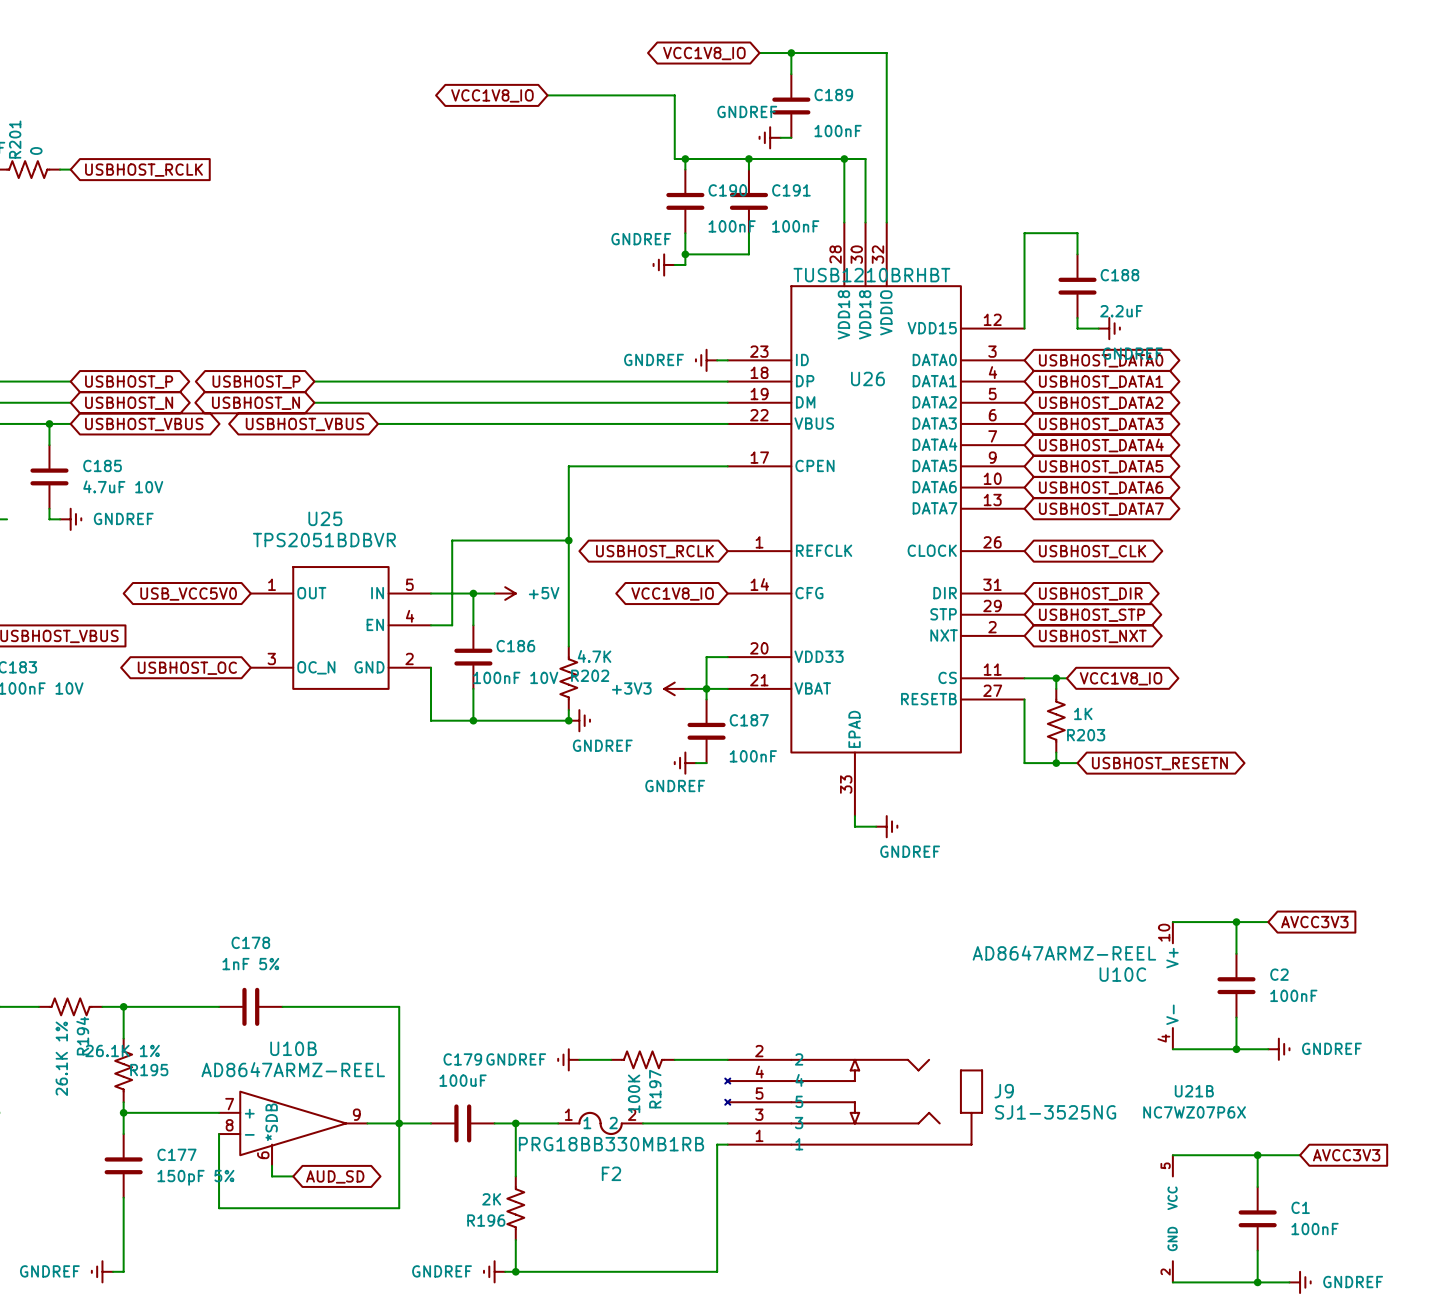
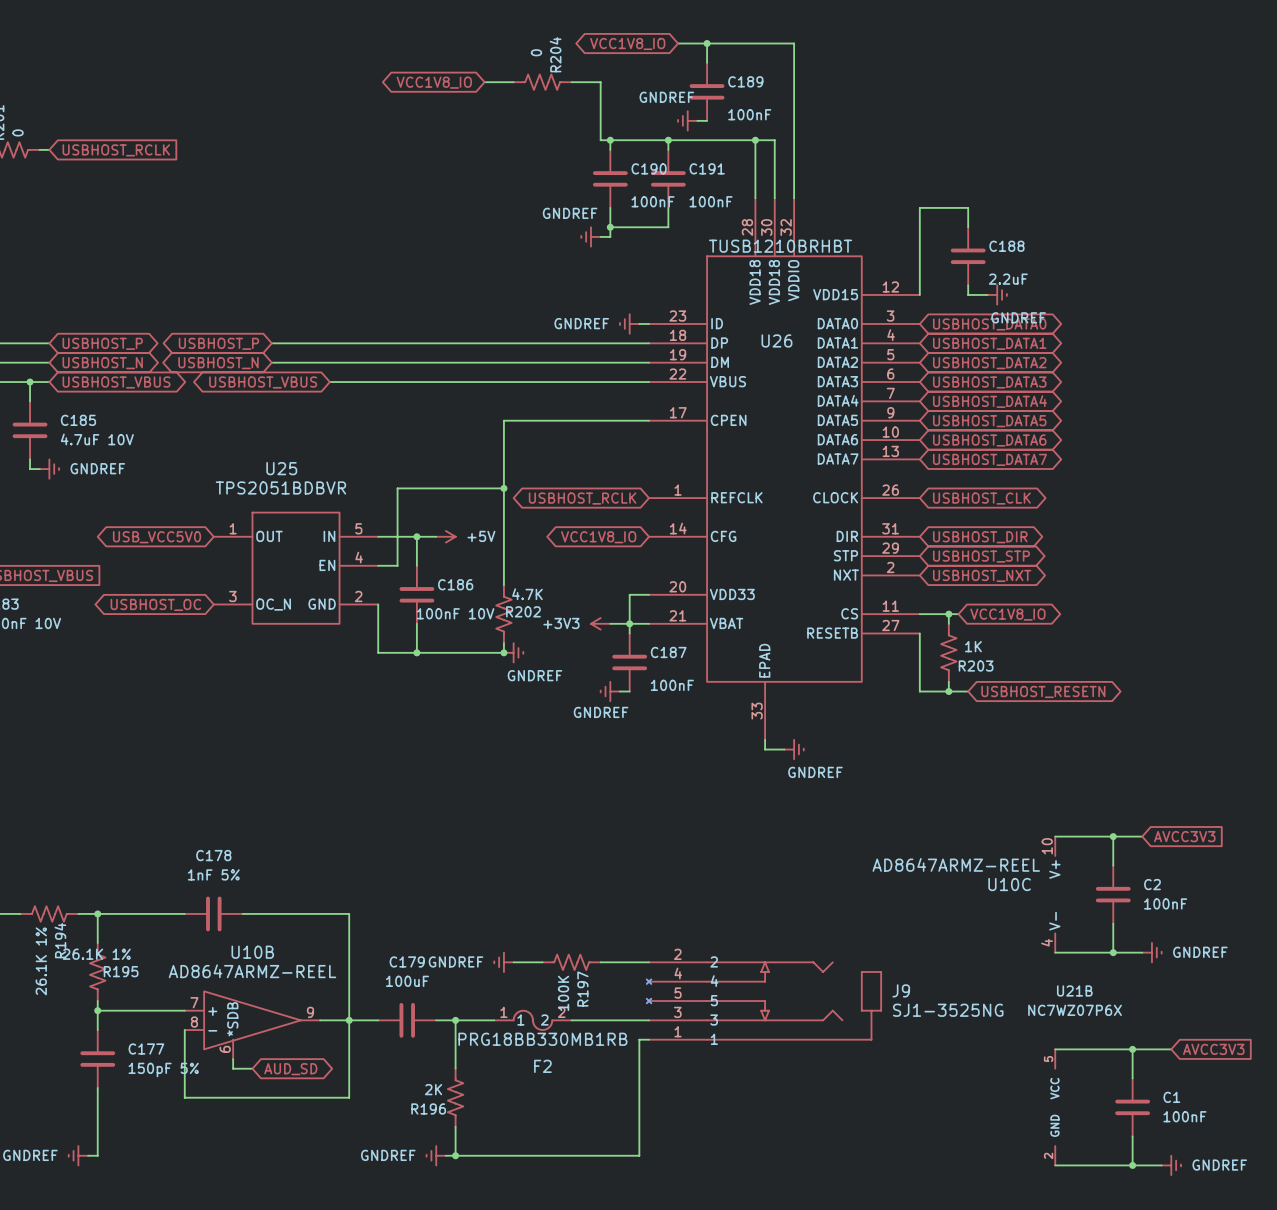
R204: none -> 0 (542, 82)

